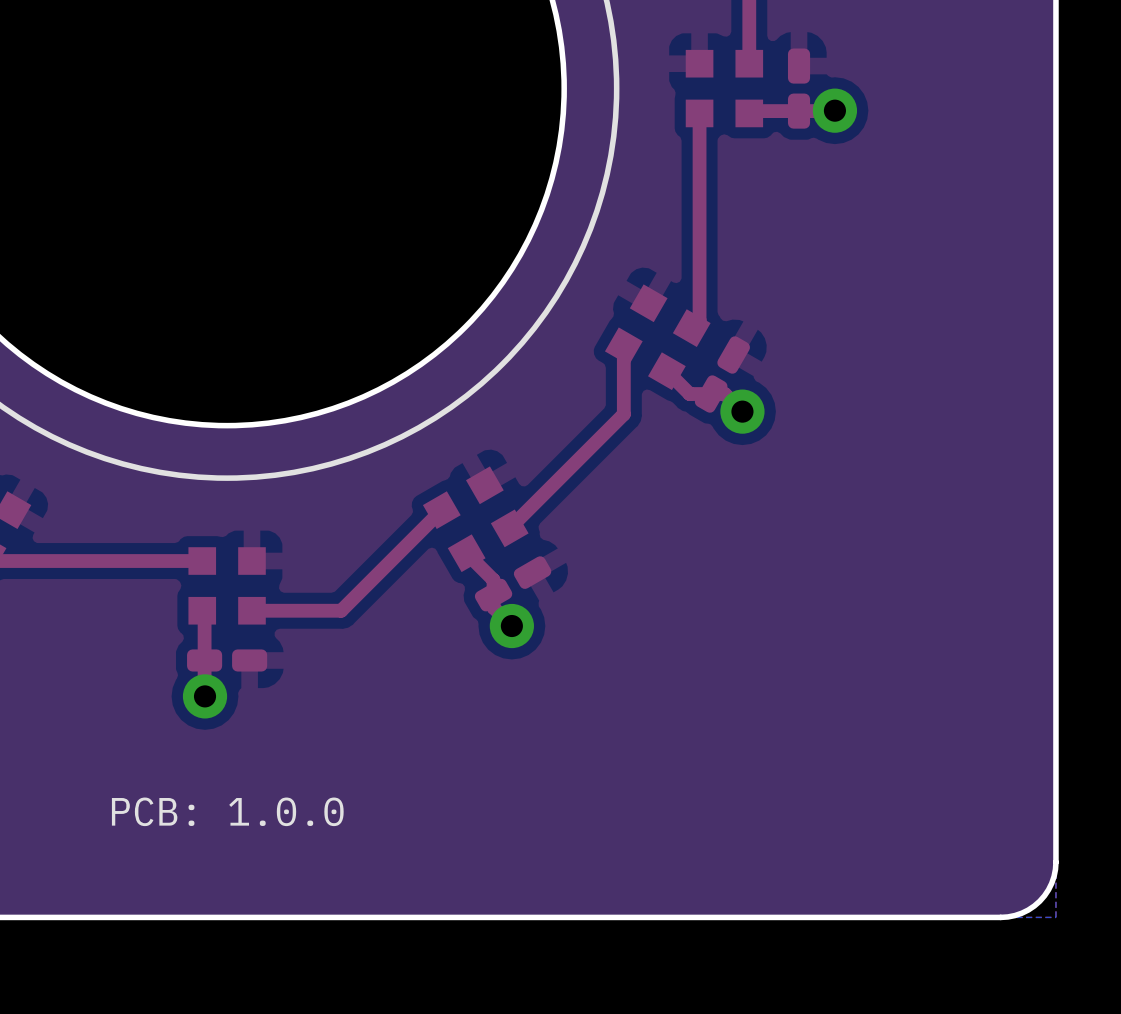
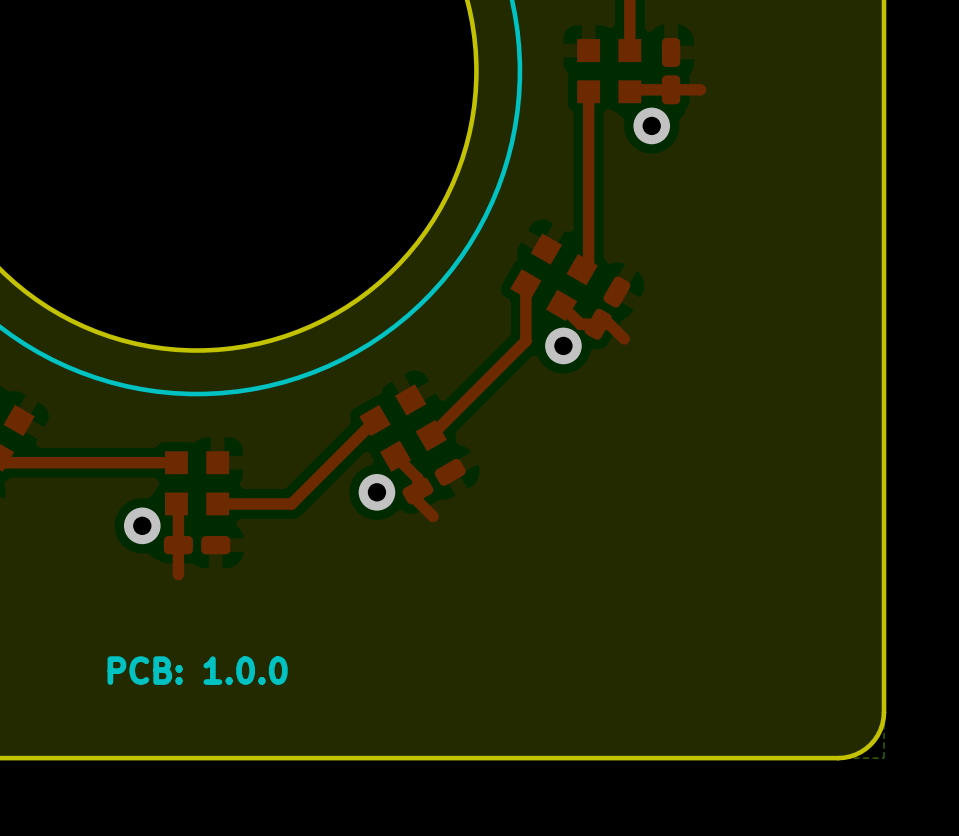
via position: (834, 110) -> (651, 125)
via position: (742, 411) -> (563, 345)
via position: (511, 626) -> (376, 492)
via position: (205, 696) -> (142, 525)

